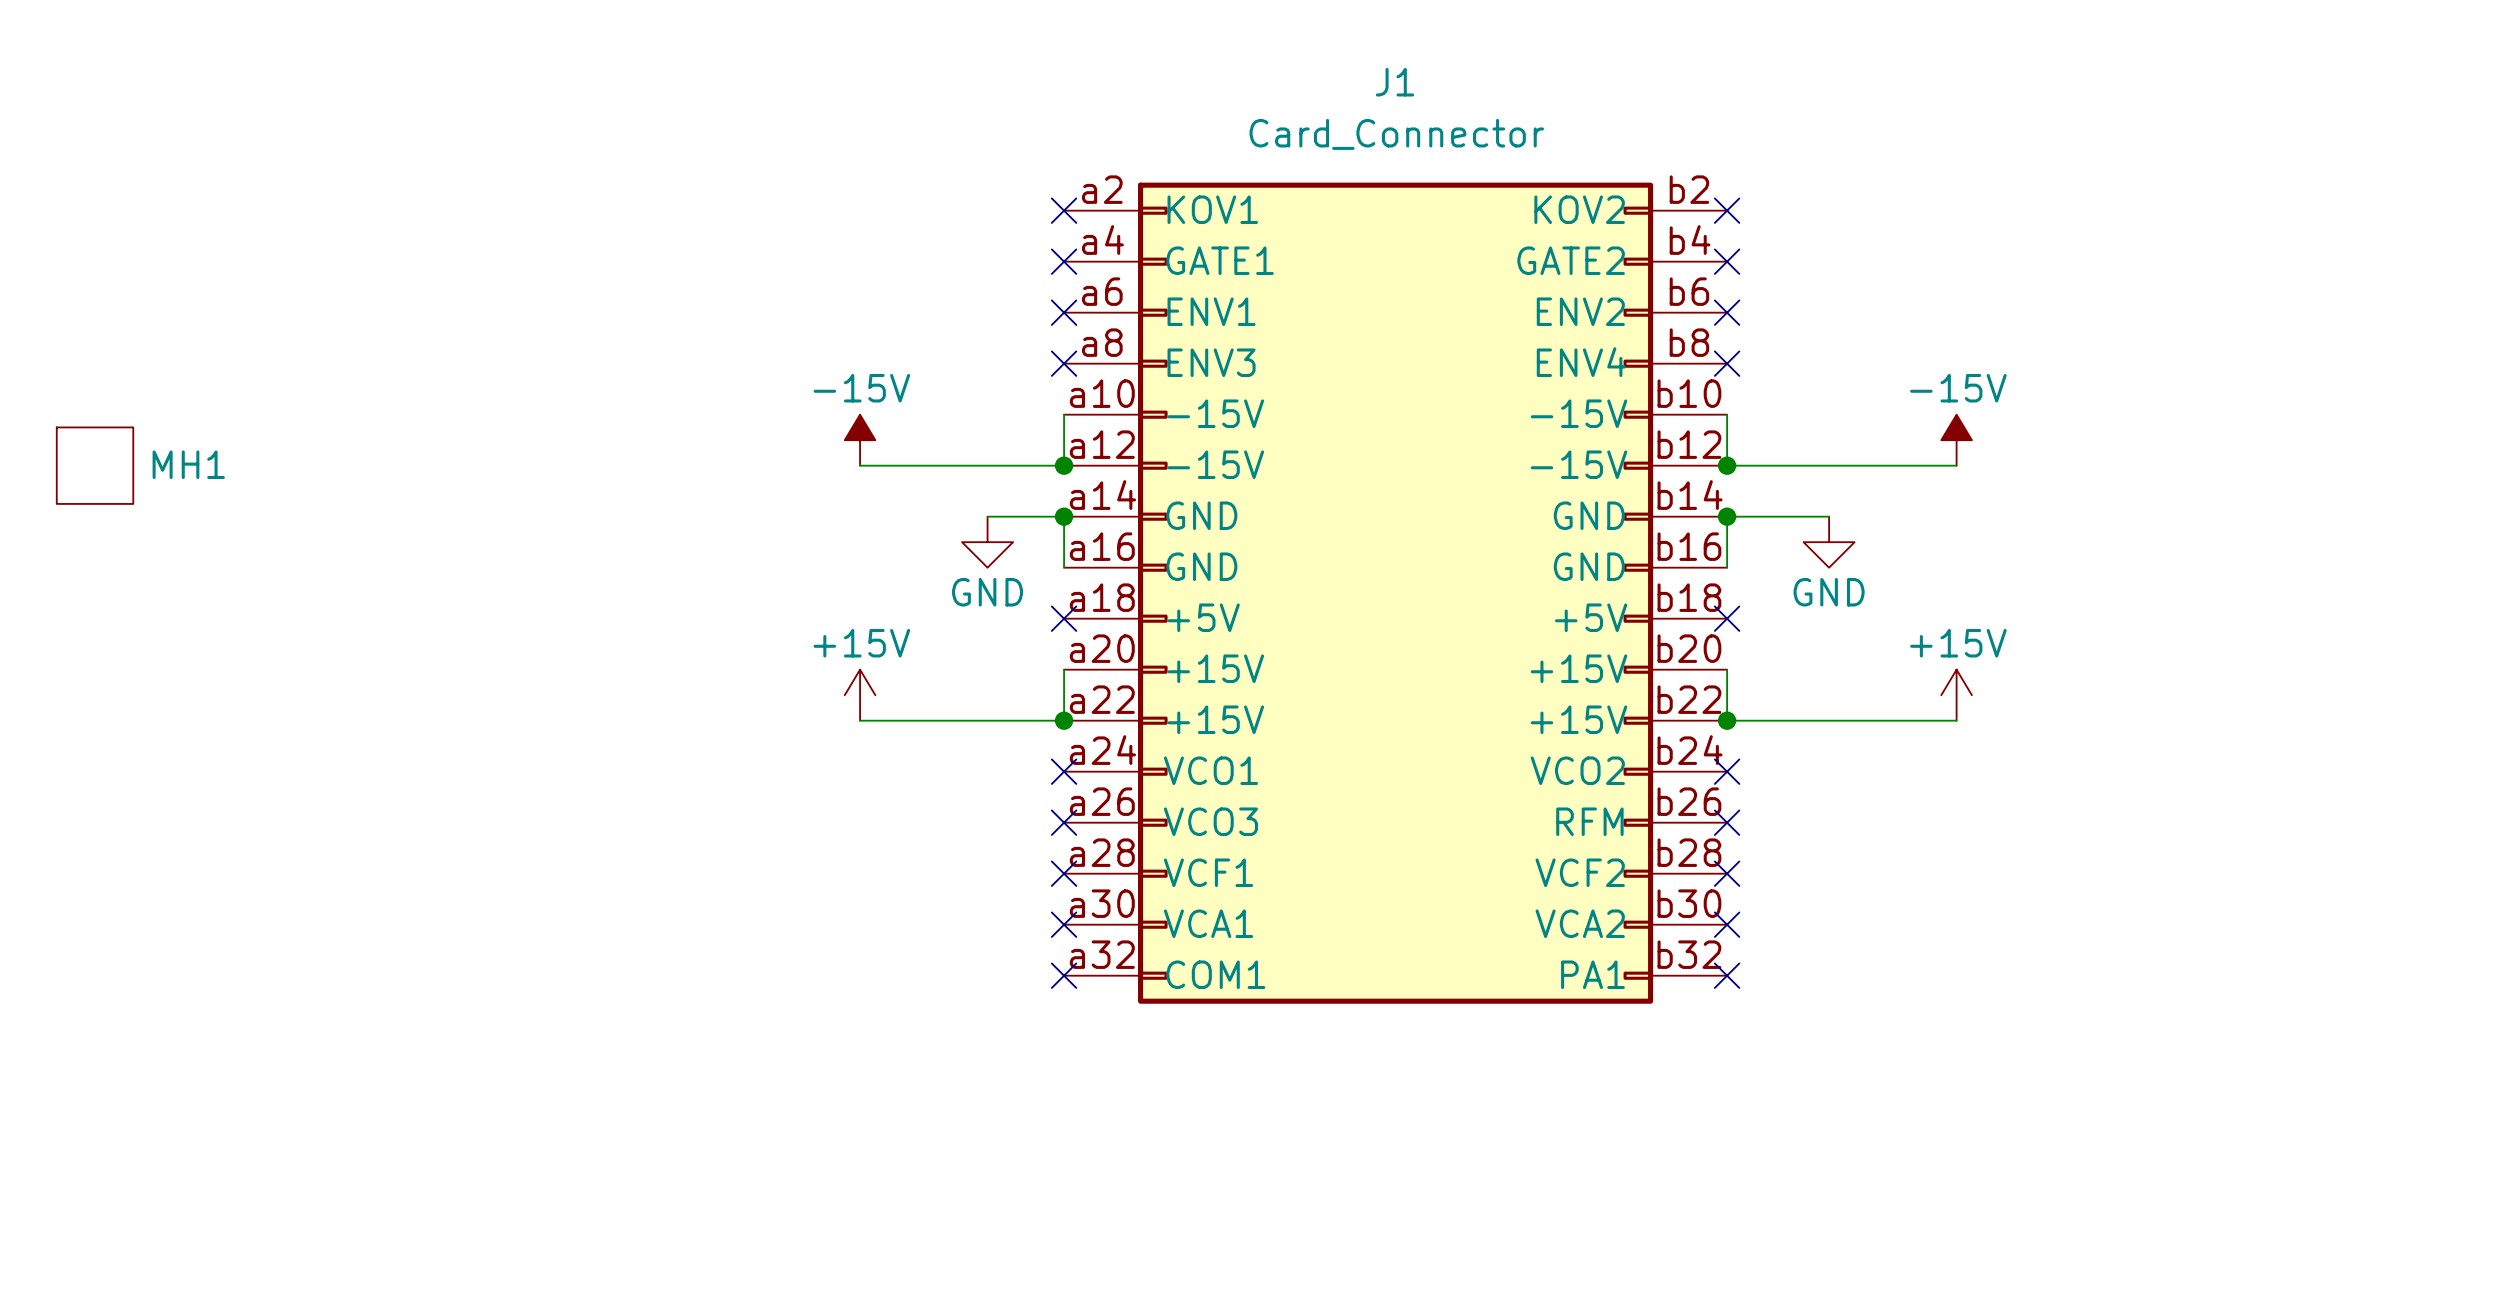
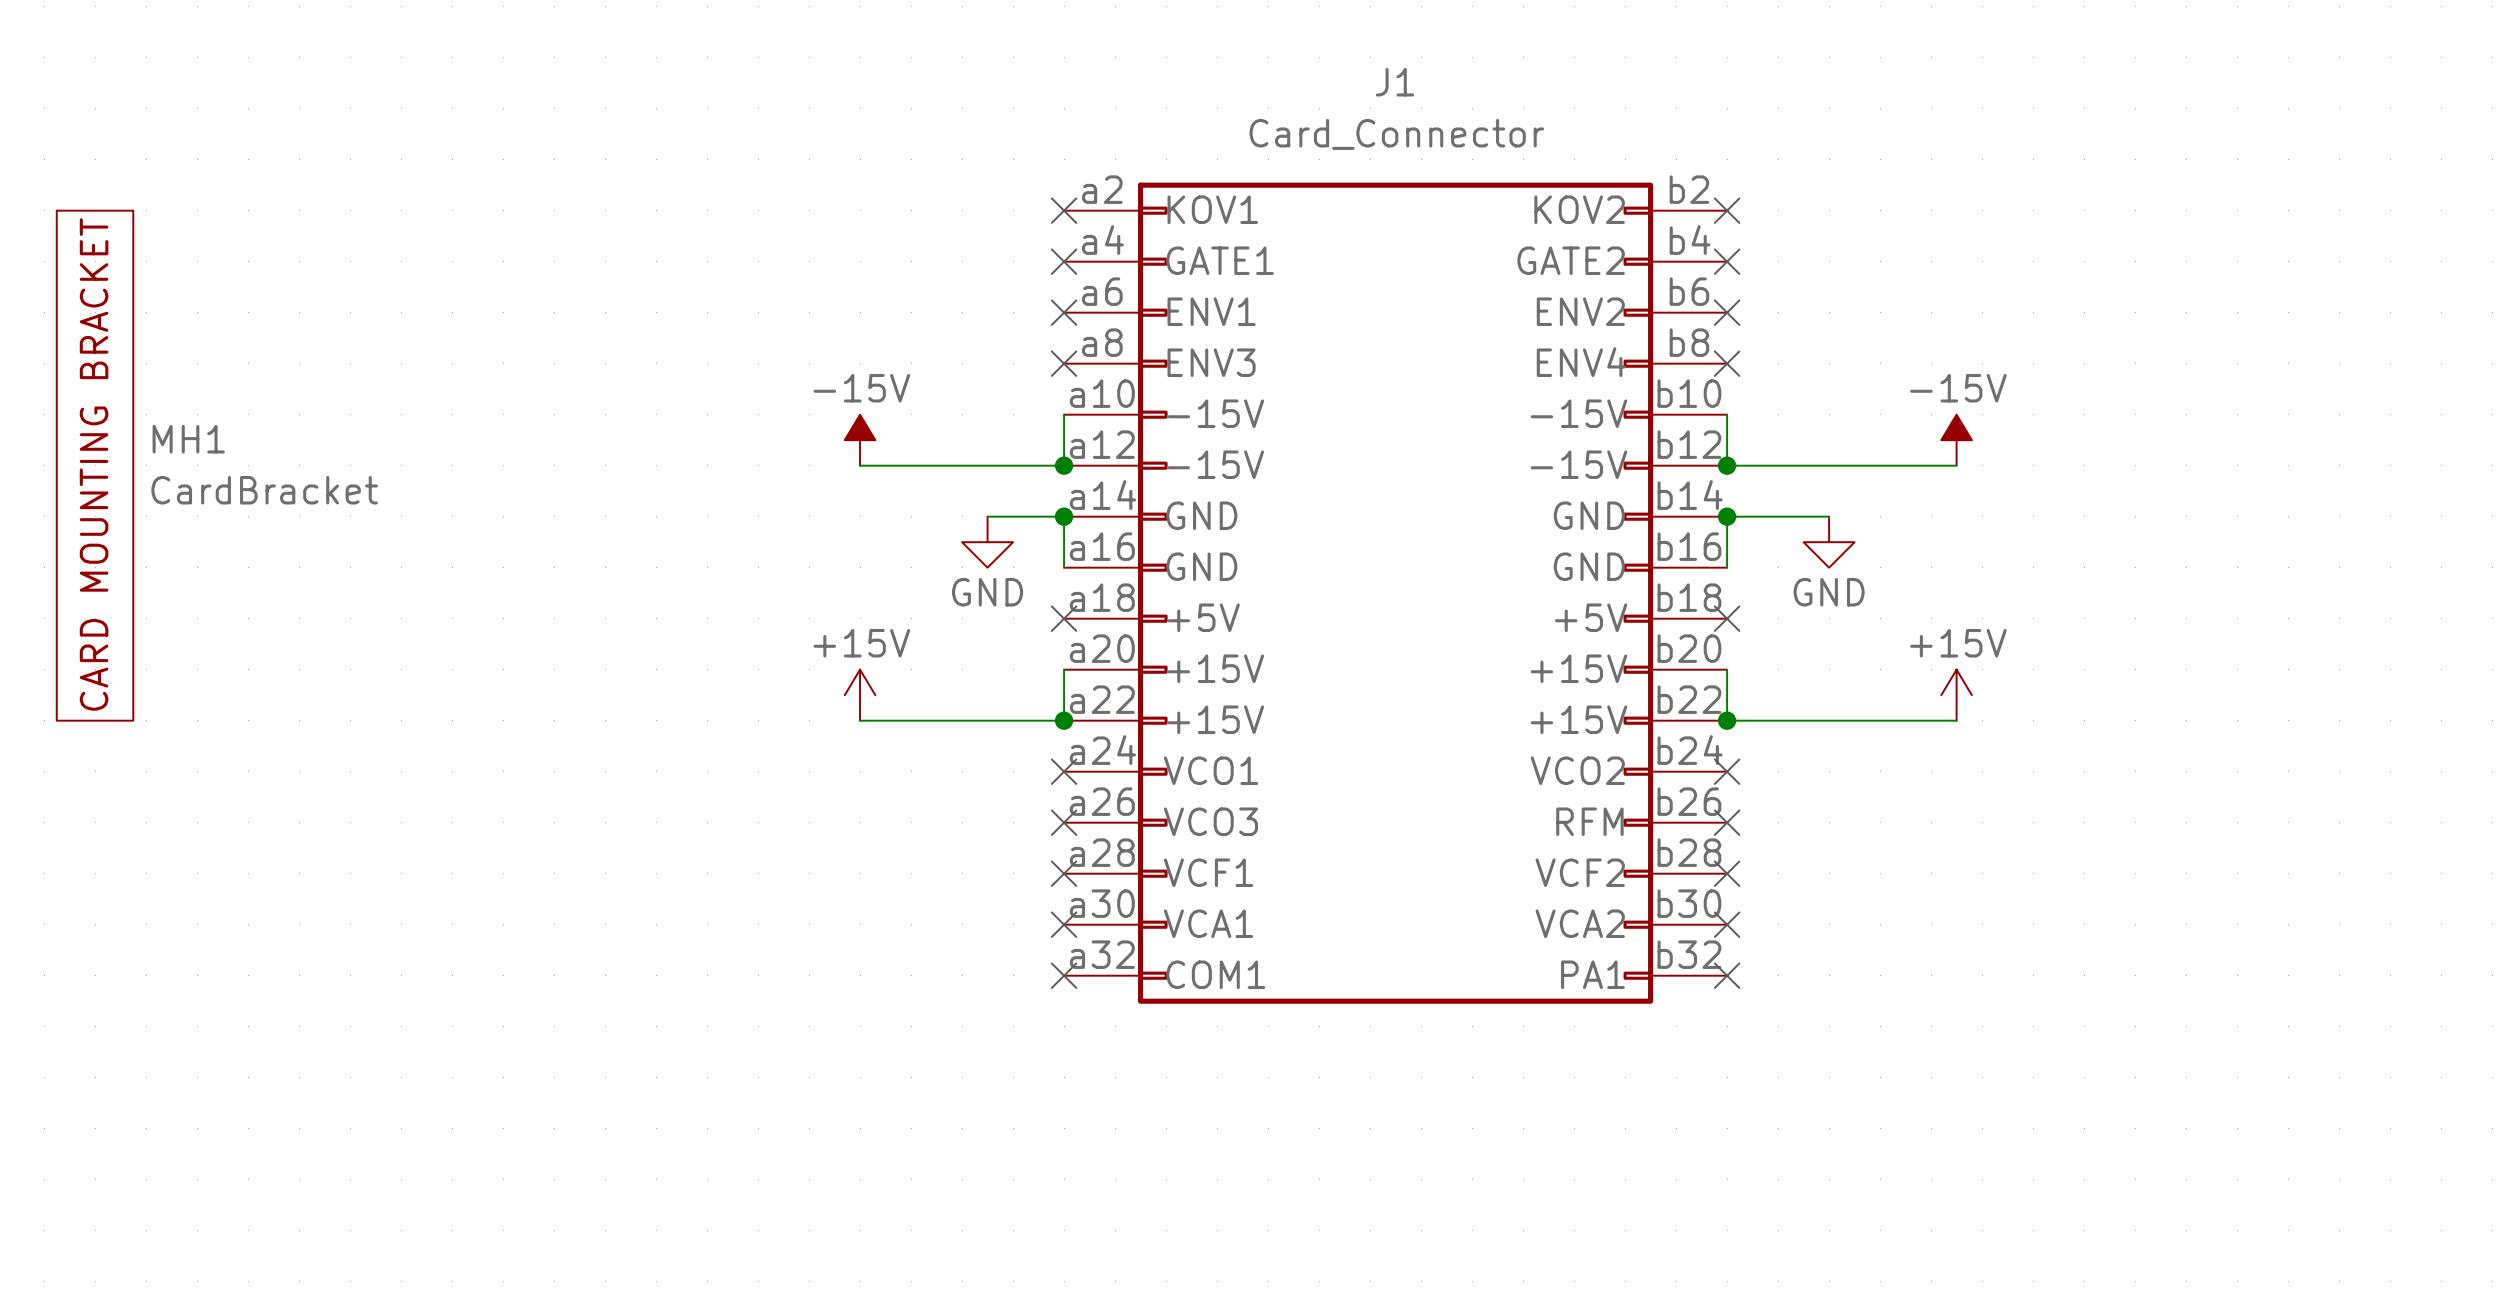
MH1 symbol: [56, 427, 134, 504] -> [56, 210, 134, 721]
MH1 value: none -> CardBracket (264, 490)

